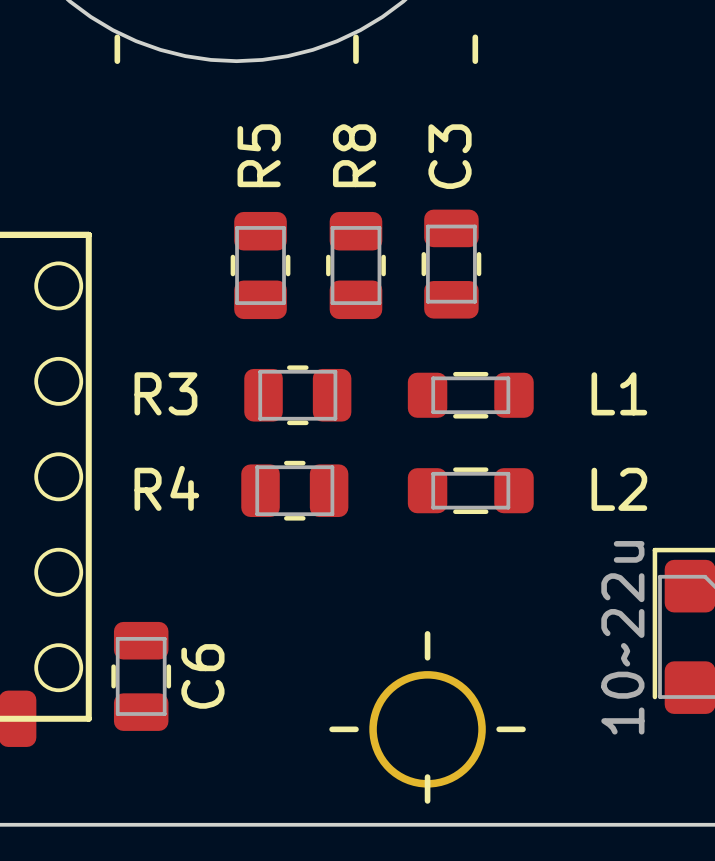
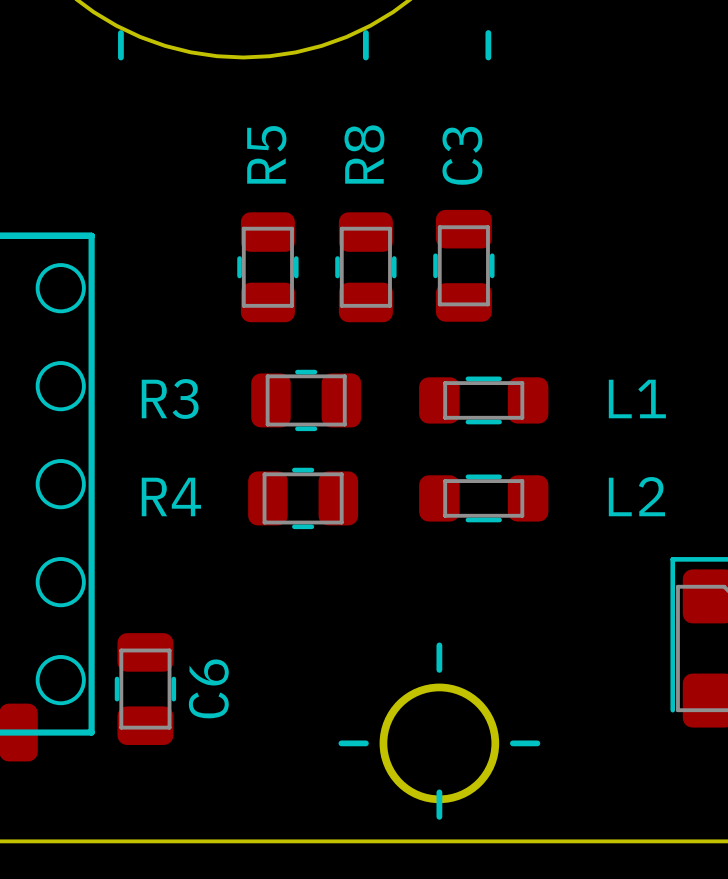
part value: 10~22u (622, 637) -> none

